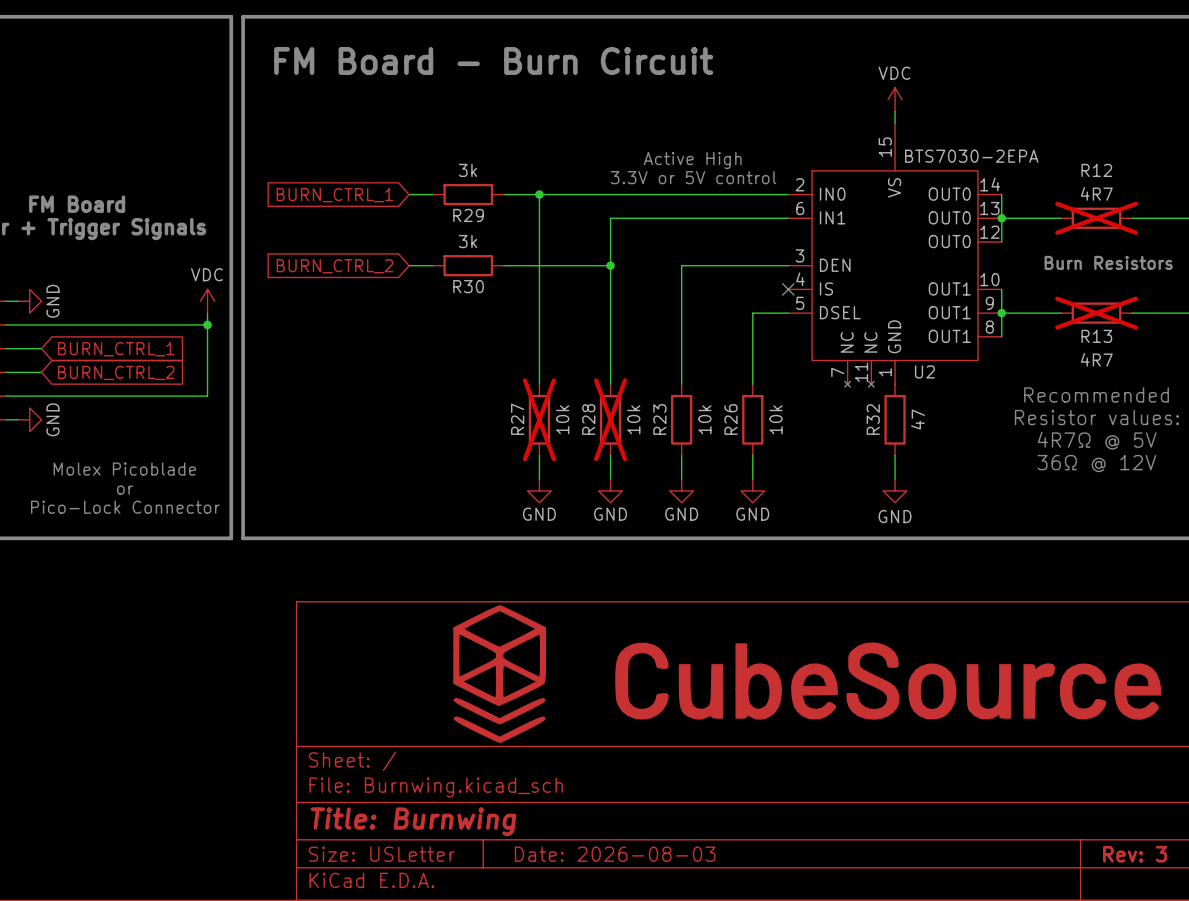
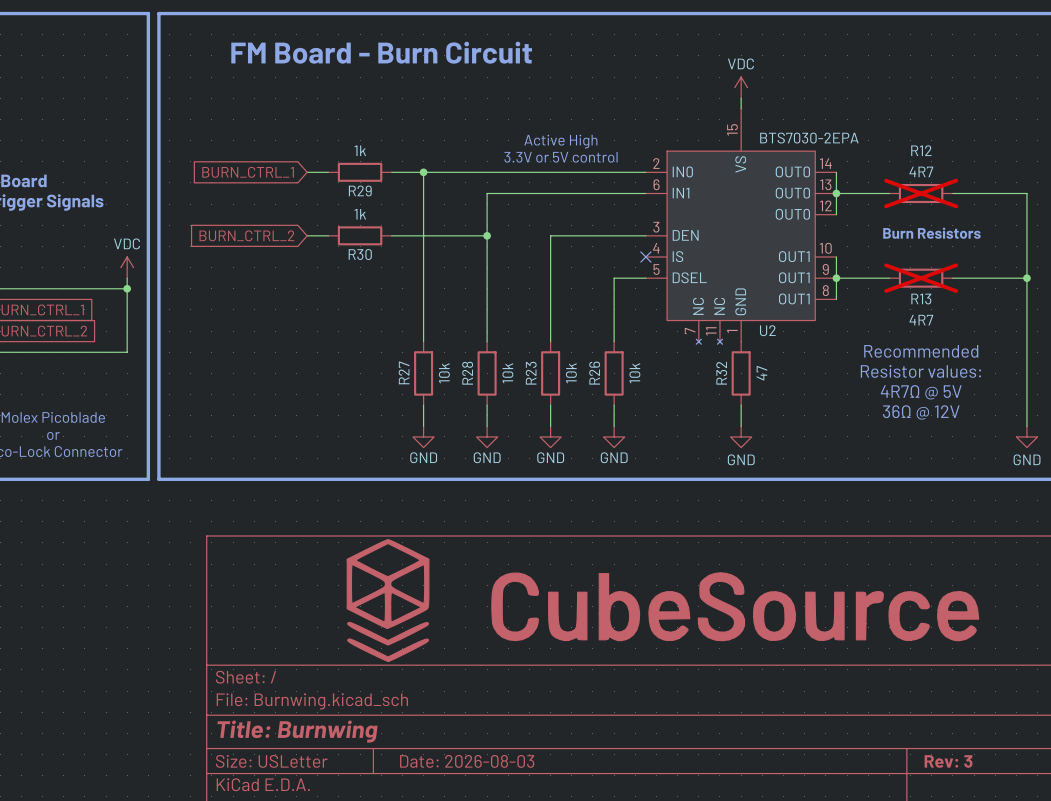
R29 value: 3k (468, 170) -> 1k (360, 150)
R30 value: 3k (468, 241) -> 1k (360, 214)
R27 do-not-place cross: (539, 419) -> none
R28 do-not-place cross: (610, 419) -> none

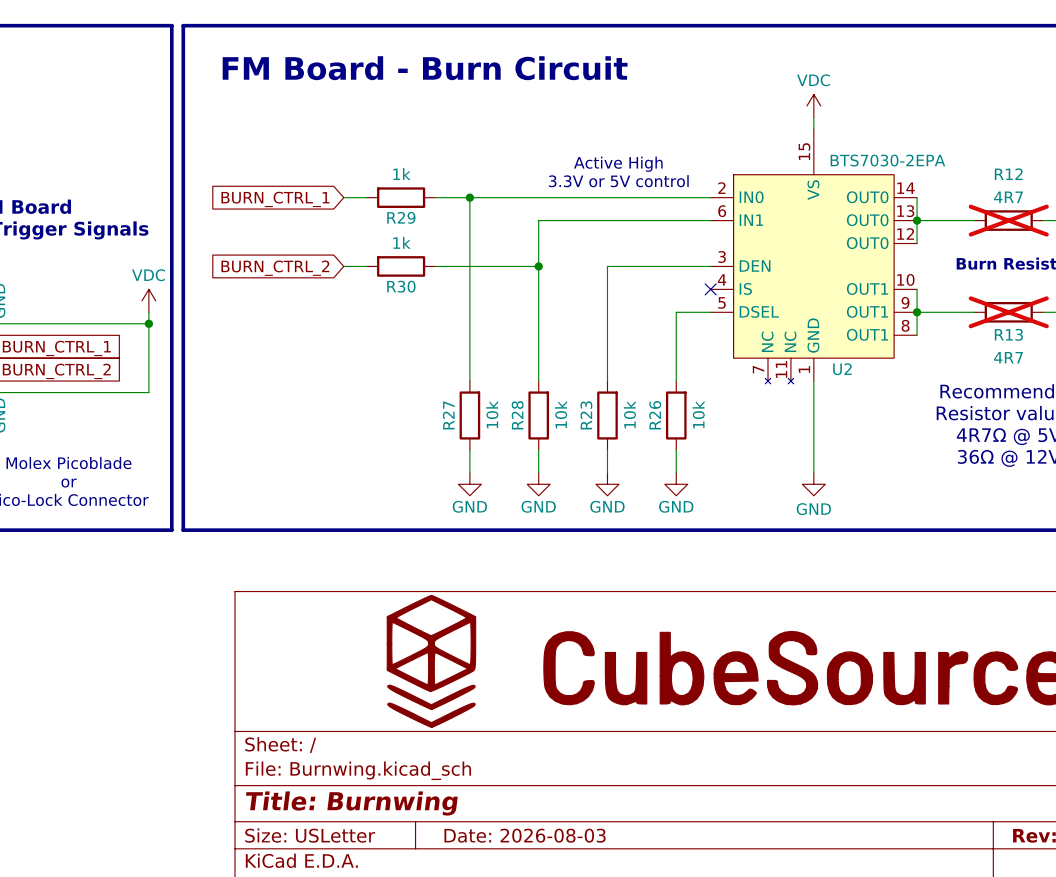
wire: none -> (813, 381) (813, 449)
R32: 47 (741, 373) -> none

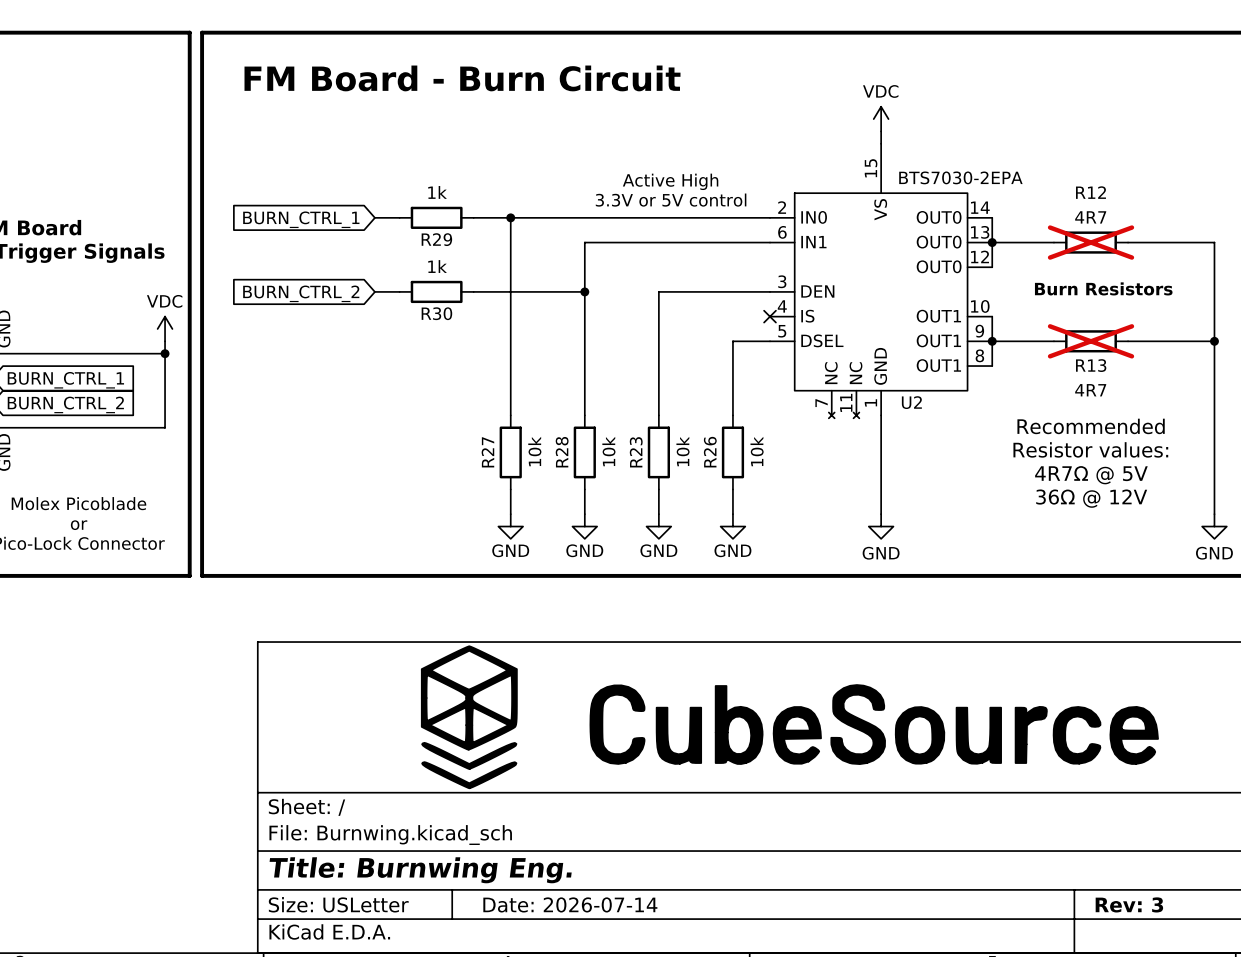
title block: Title: Burnwing (351, 803) -> Title: Burnwing Eng. (420, 870)
title block: Date: 2026-08-03 (525, 835) -> Date: 2026-07-14 (570, 904)

